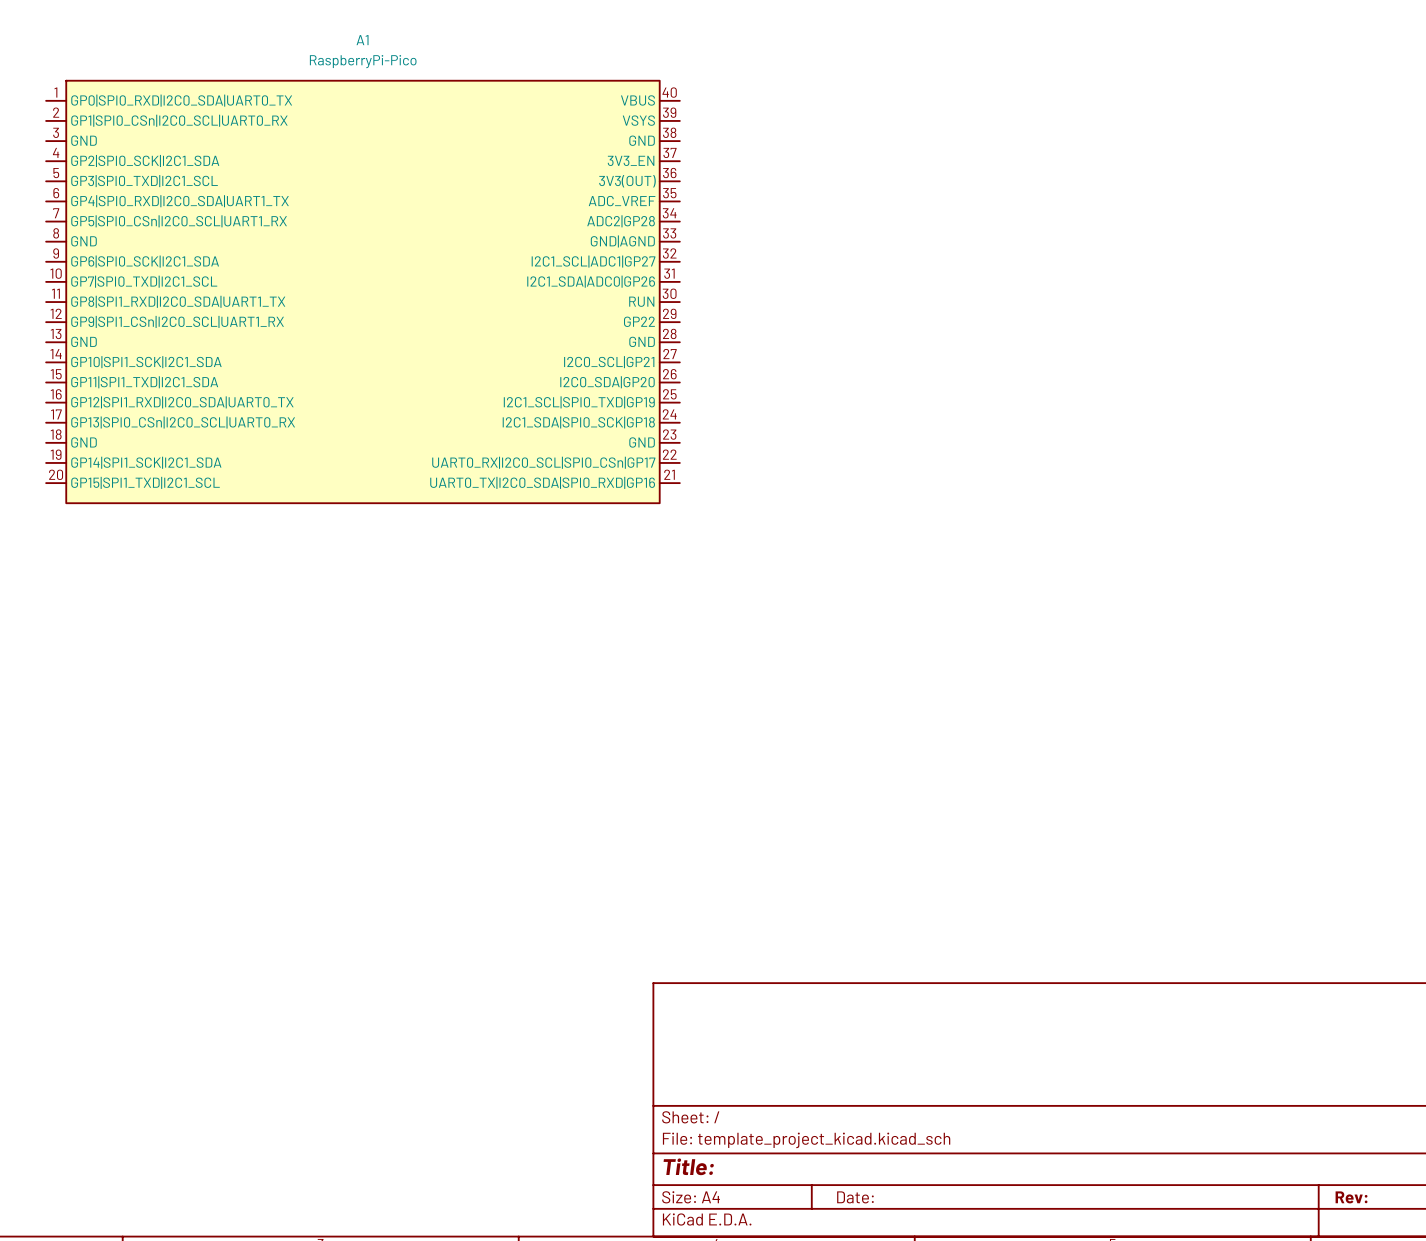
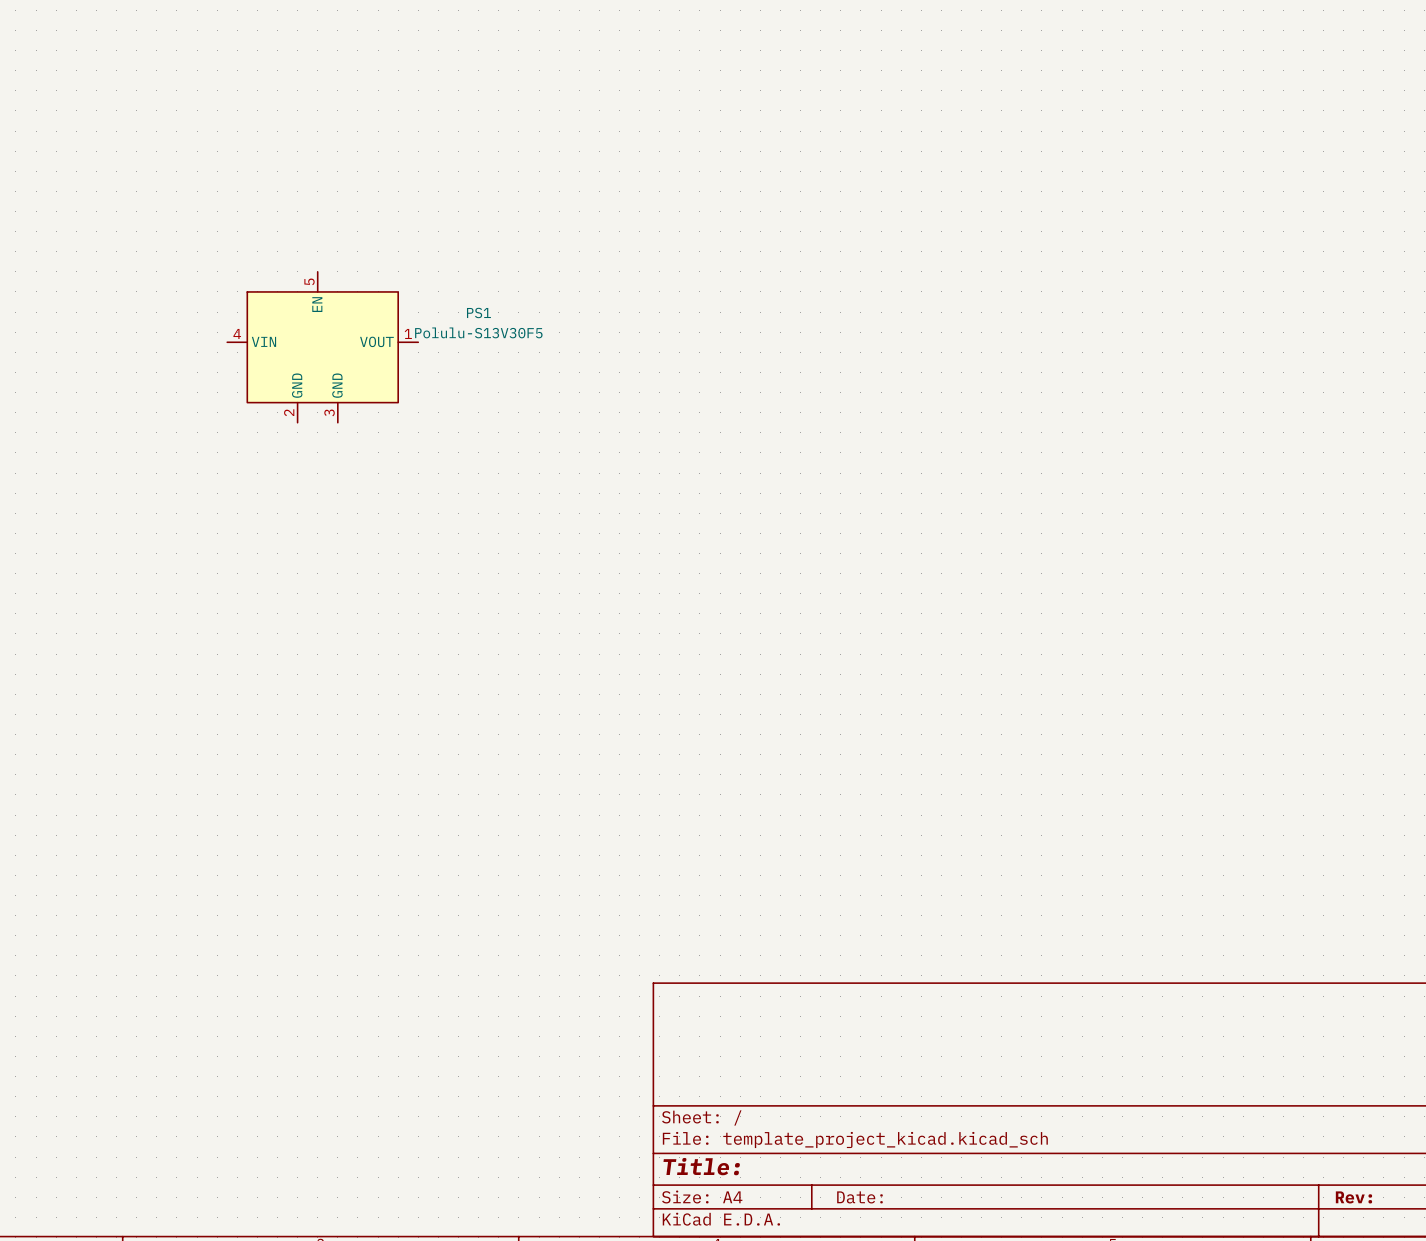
A1: RaspberryPi-Pico (362, 291) -> none
PS1: none -> Polulu-S13V30F5 (322, 347)

